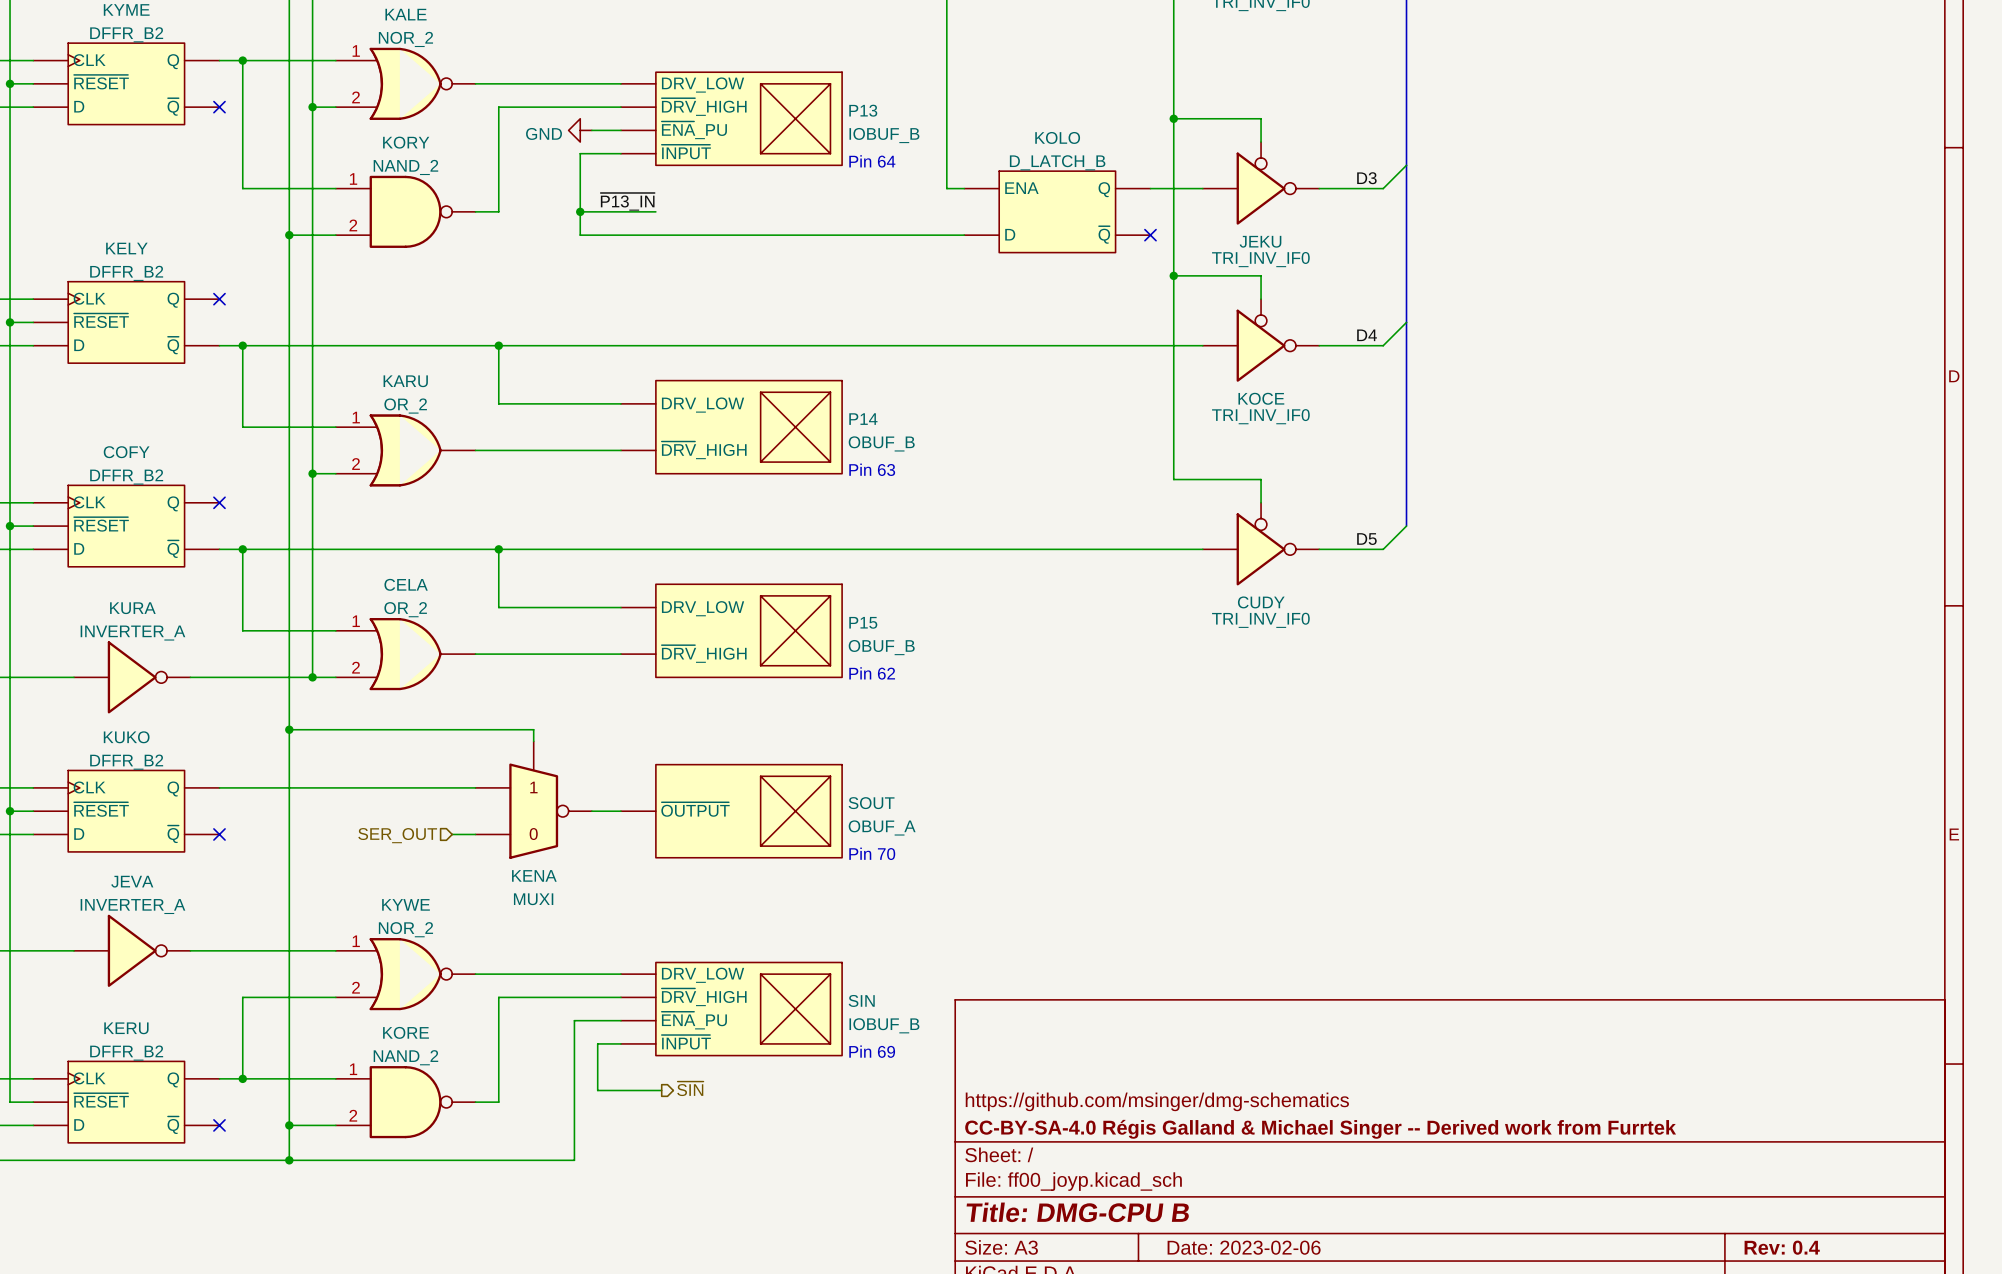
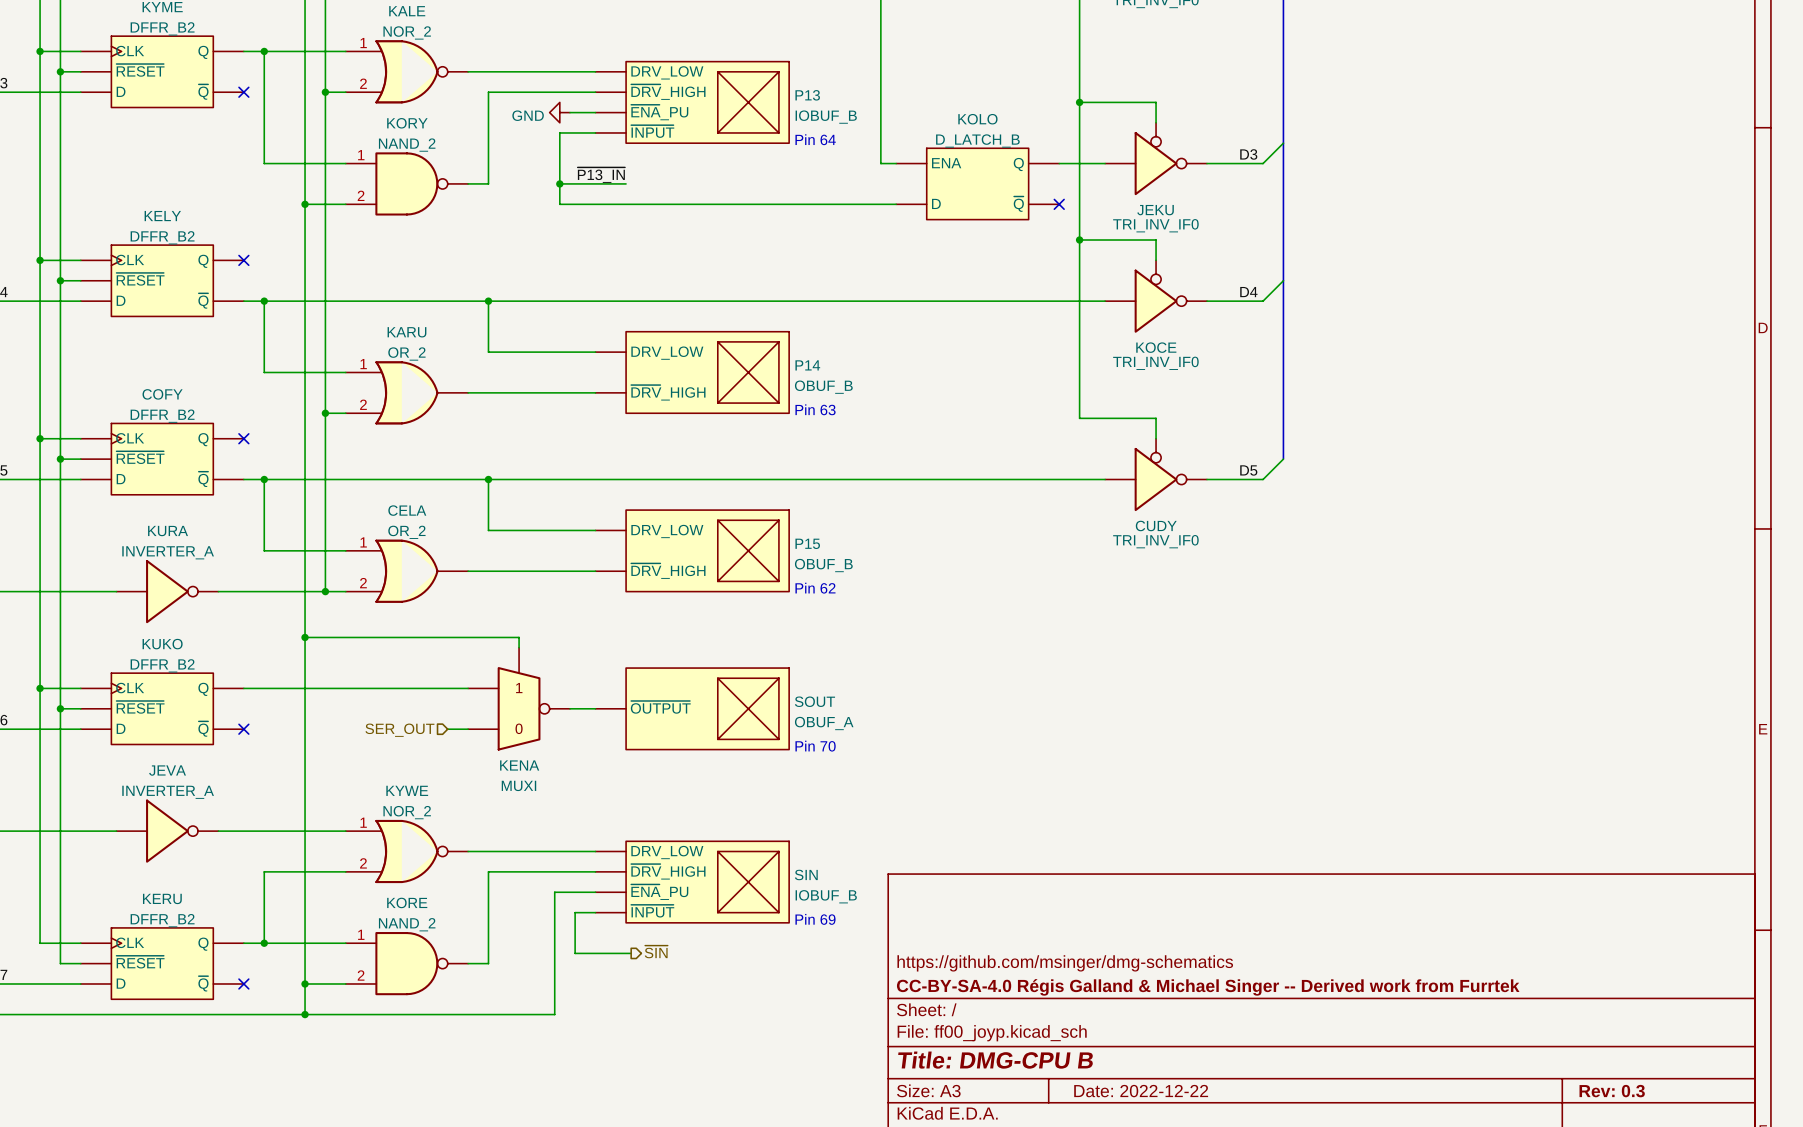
title block: Date: 2023-02-06 (1244, 1247) -> Date: 2022-12-22 (1141, 1091)
title block: Rev: 0.4 (1782, 1247) -> Rev: 0.3 (1612, 1091)

